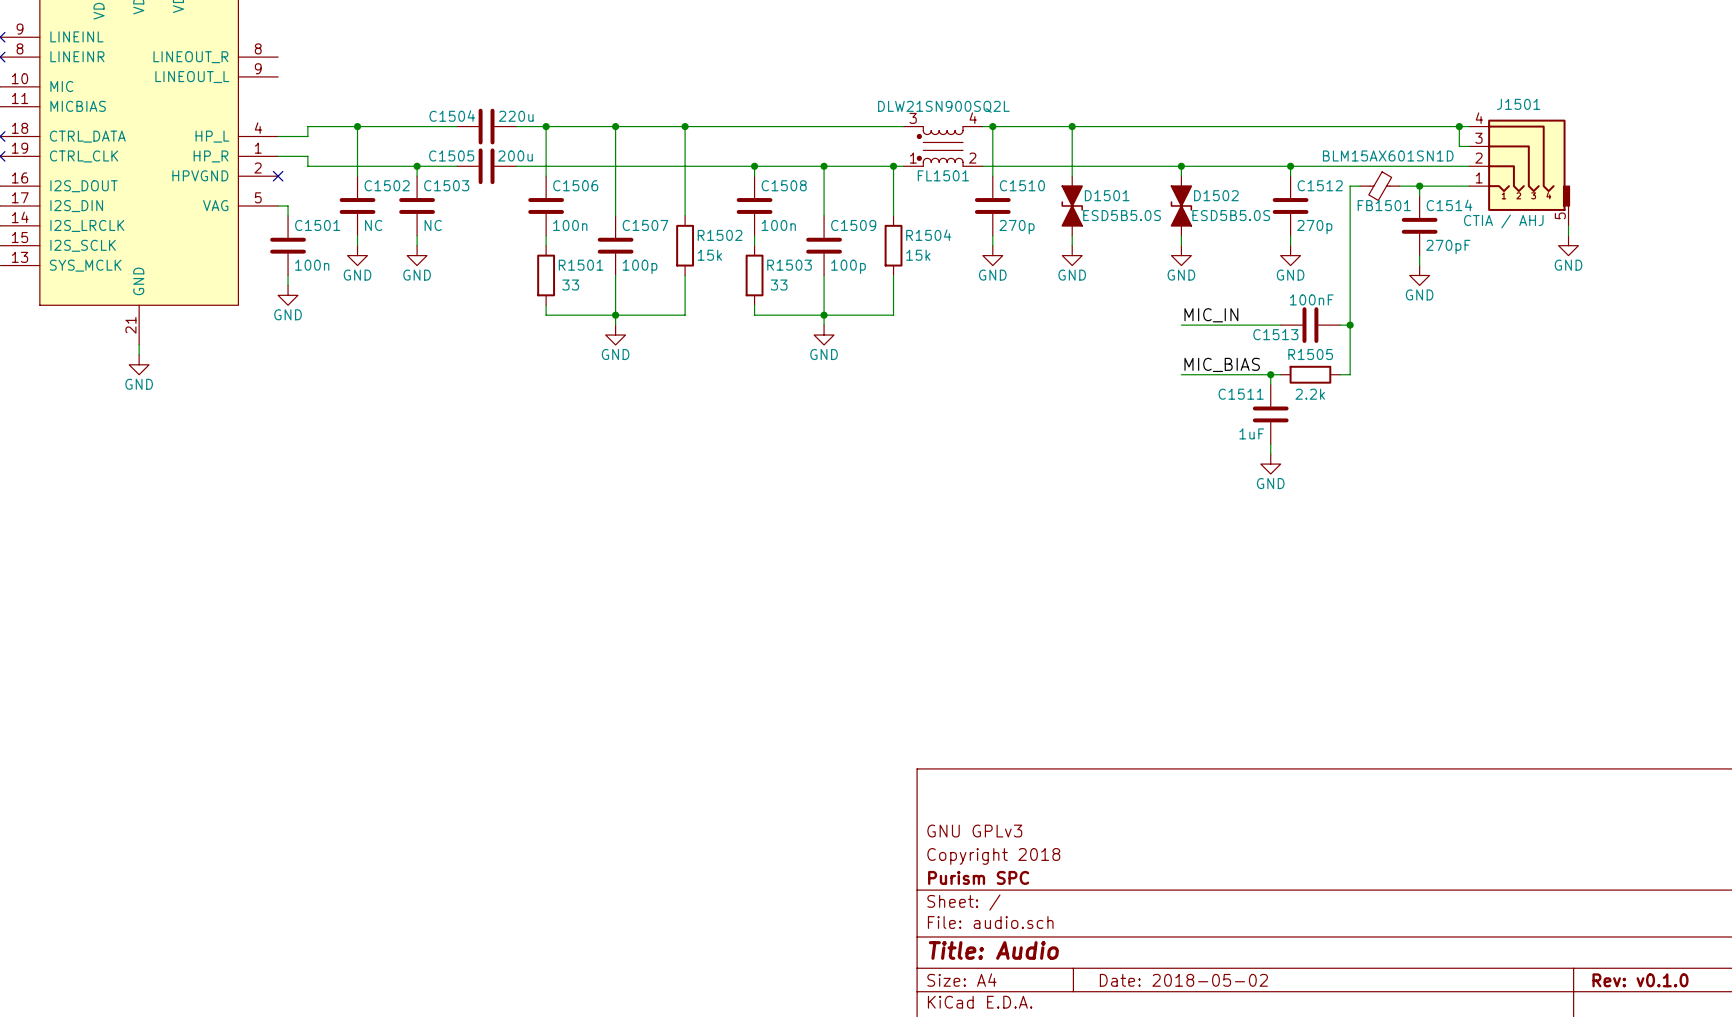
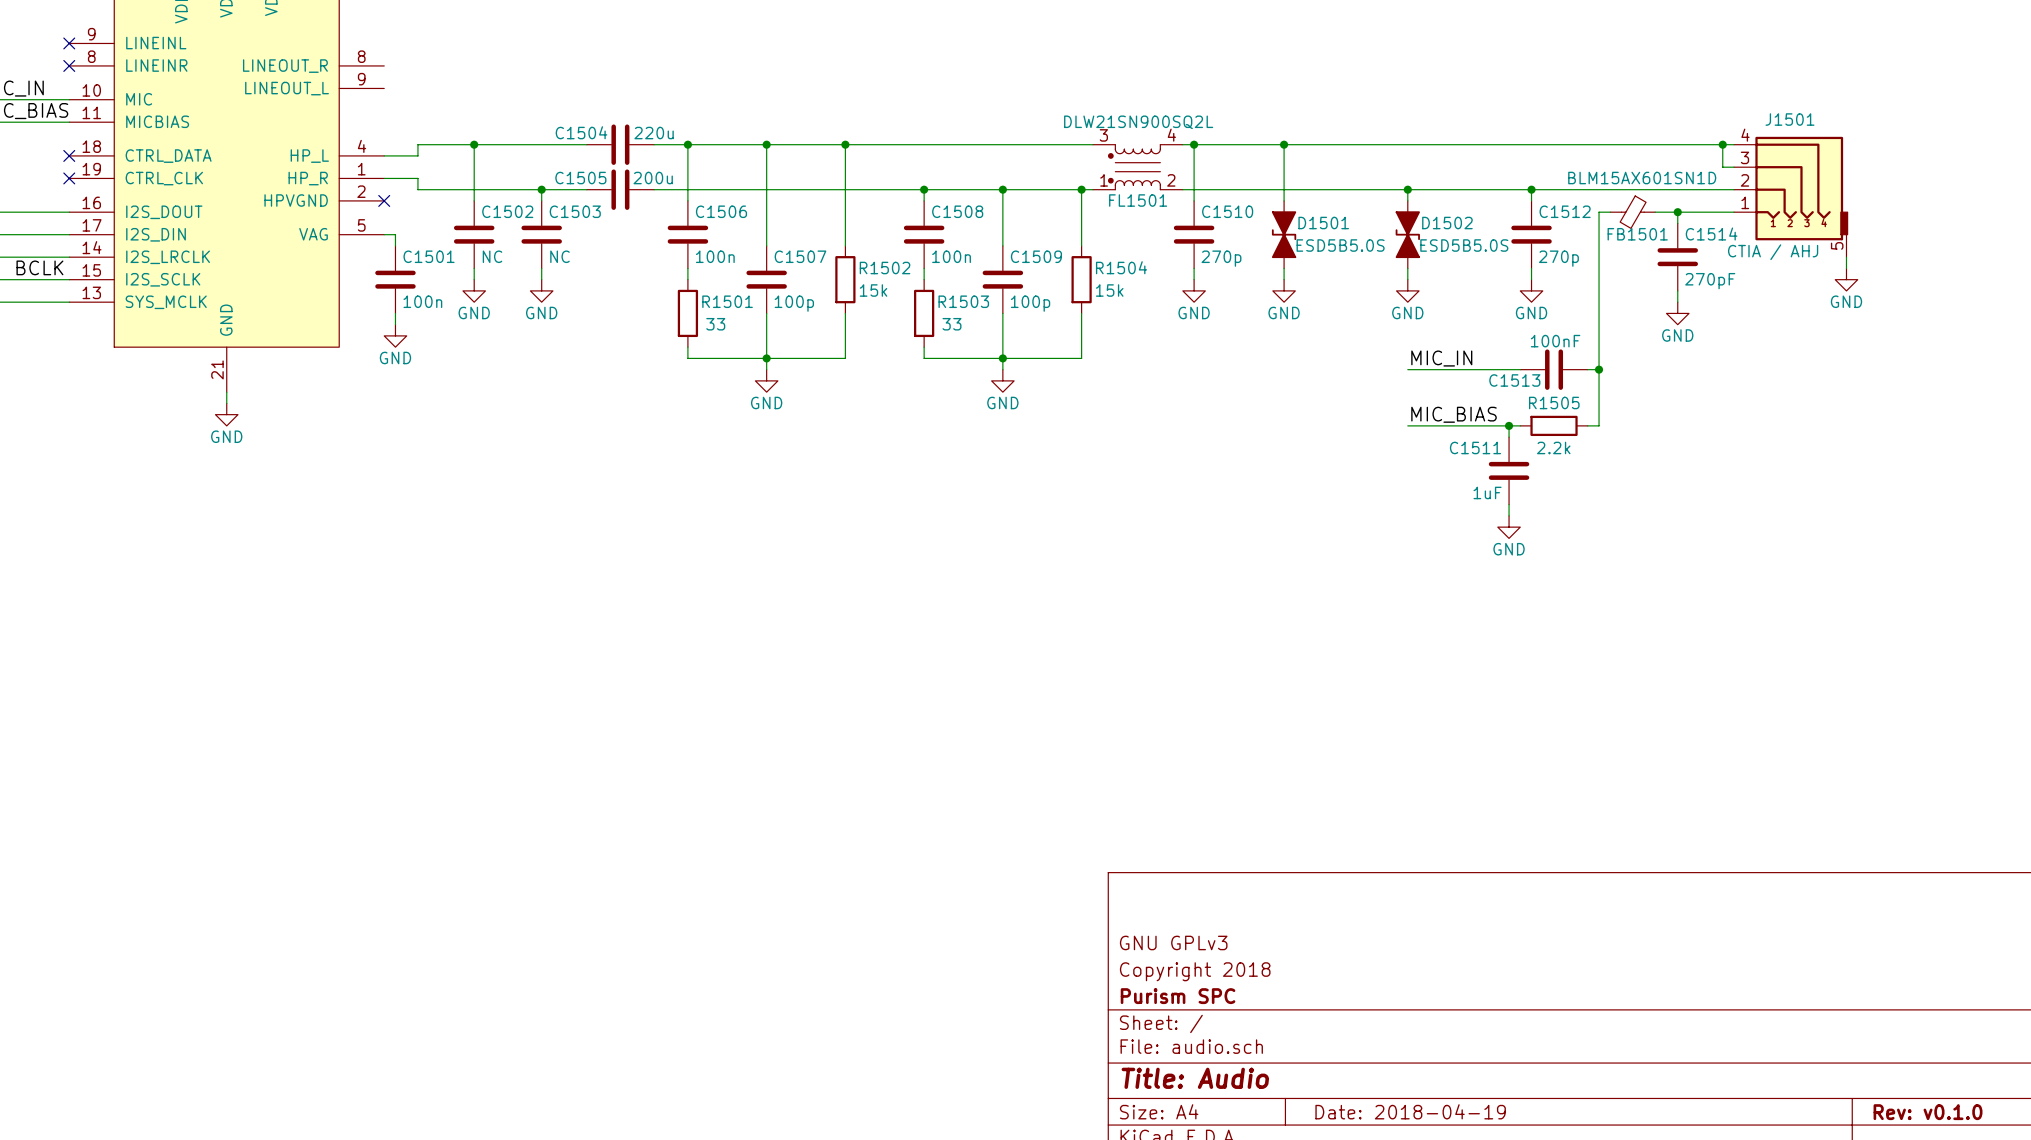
title block: Date: 2018-05-02 (1183, 980) -> Date: 2018-04-19 (1410, 1111)

